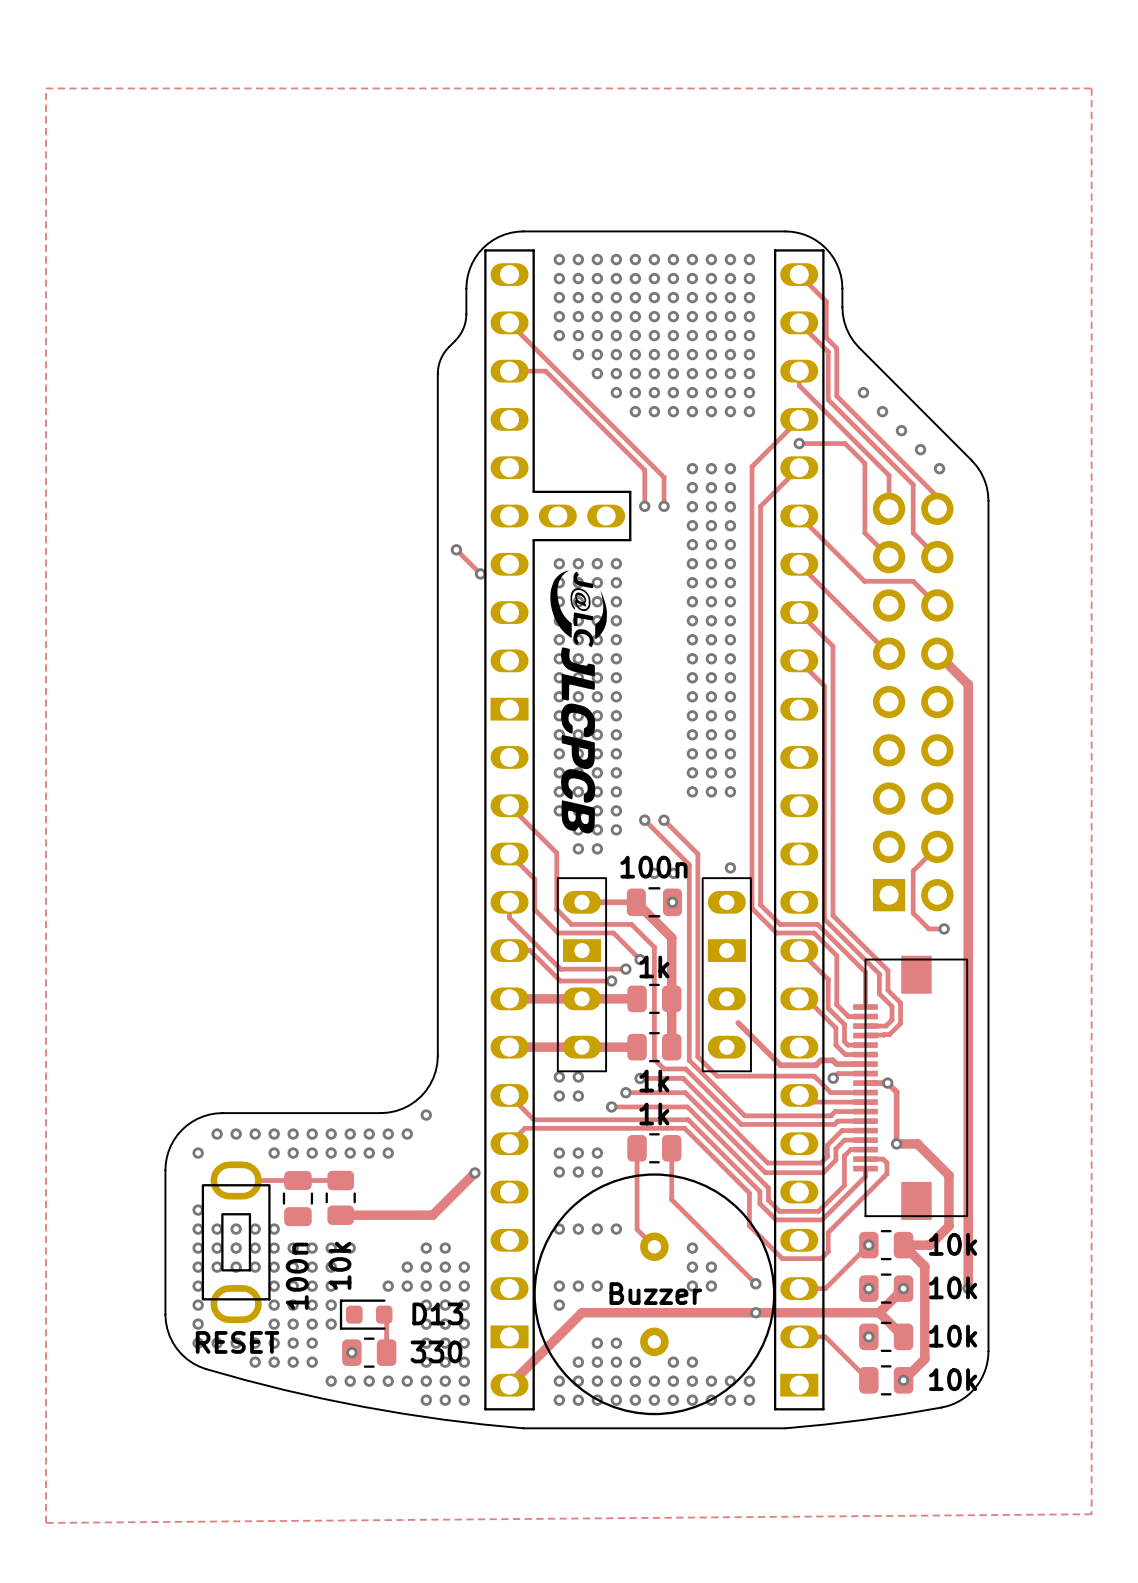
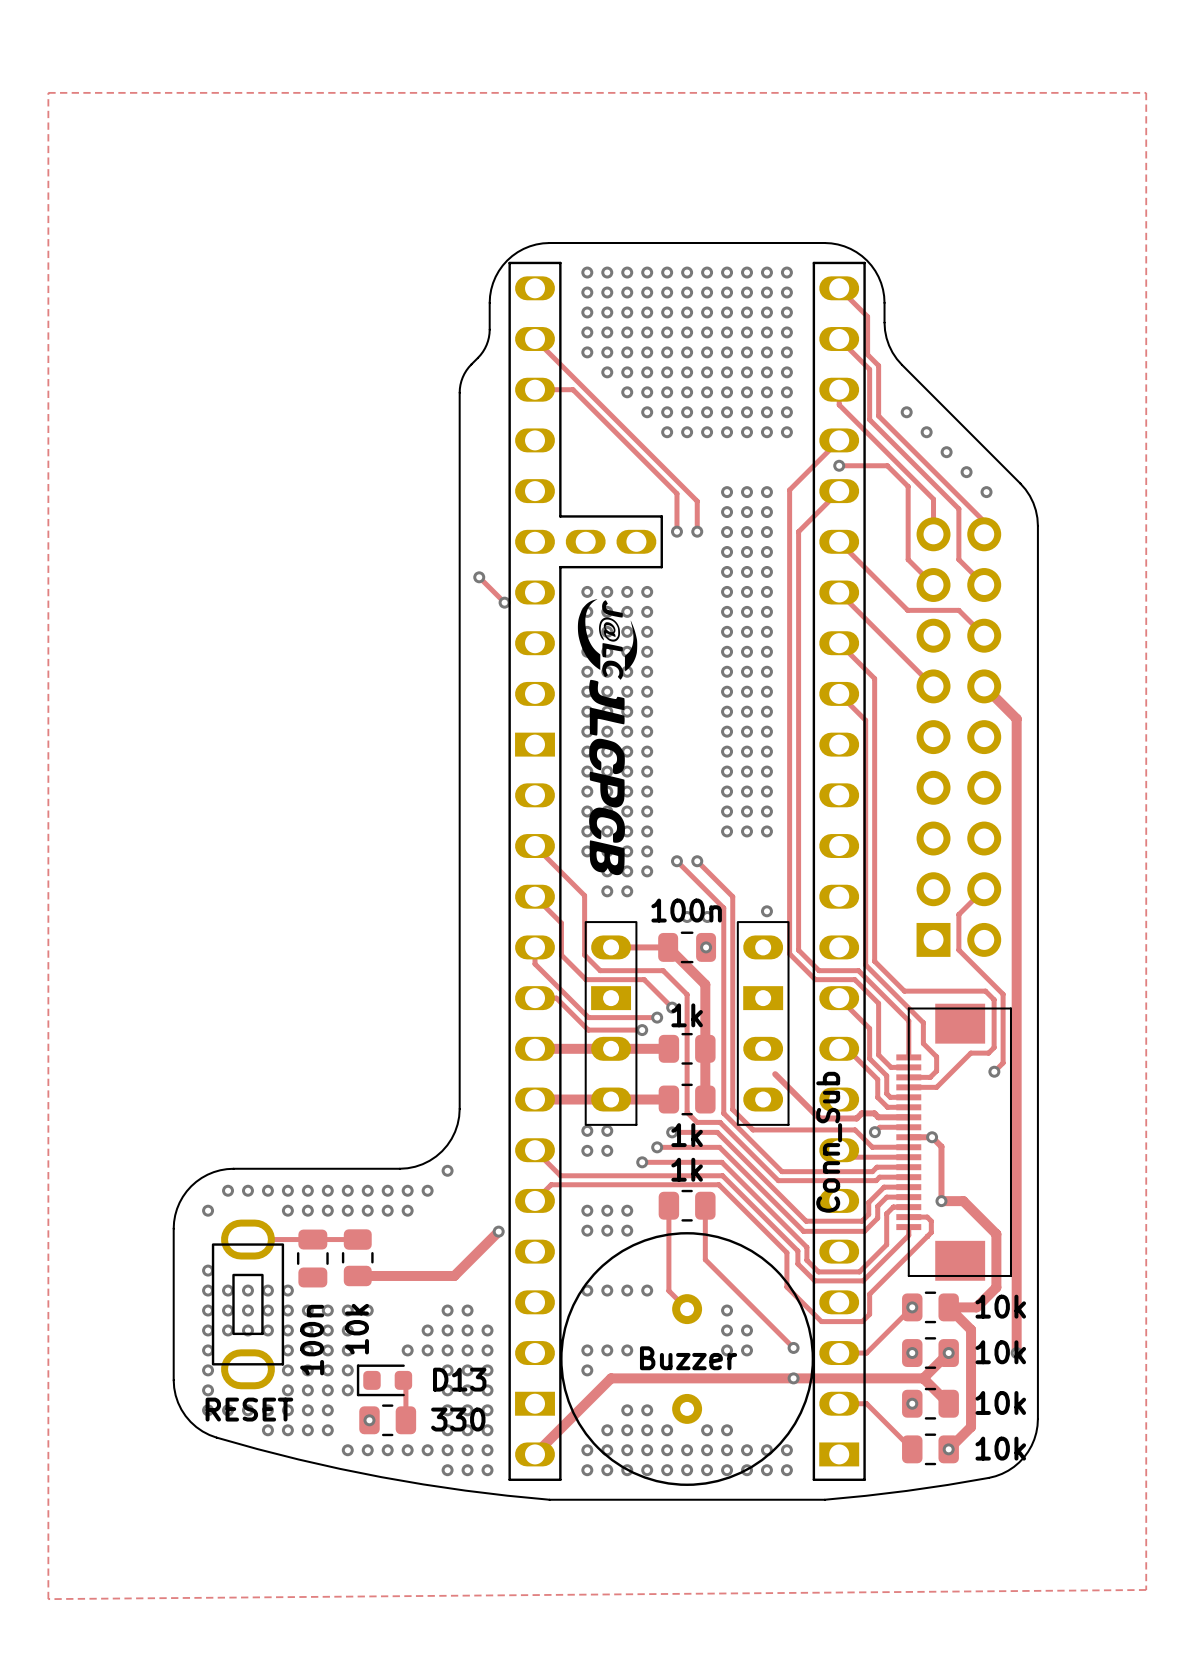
track: (913, 904) (913, 913) (928, 928) (944, 928) -> (958, 950) (1003, 994) (1003, 1063) (994, 1071)
track: (832, 915) (887, 970) (887, 990) (900, 1002) (900, 1023) (889, 1034) (865, 1035) -> (874, 961) (904, 991) (985, 991) (994, 999) (994, 1047) (988, 1053) (970, 1053) (936, 1087) (908, 1087)
via position: (944, 928) -> (994, 1071)
part footprint: [853, 955, 969, 1220] -> [896, 1003, 1012, 1281]
part value: none -> Conn_Sub (829, 1142)

